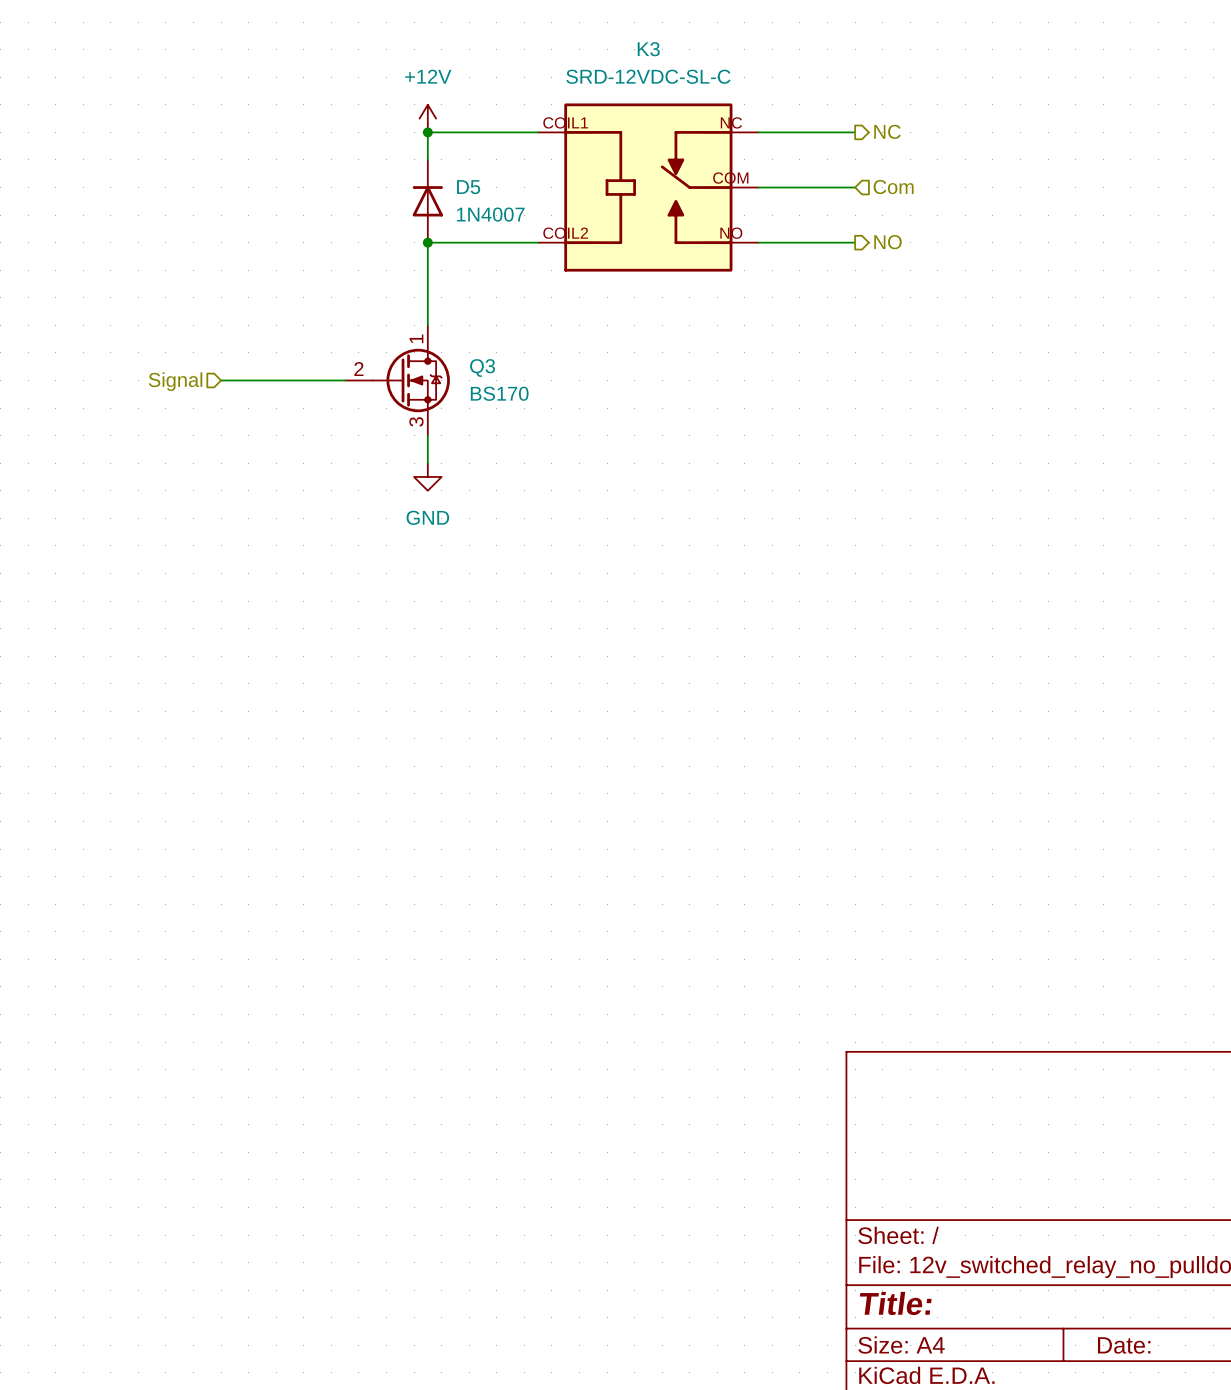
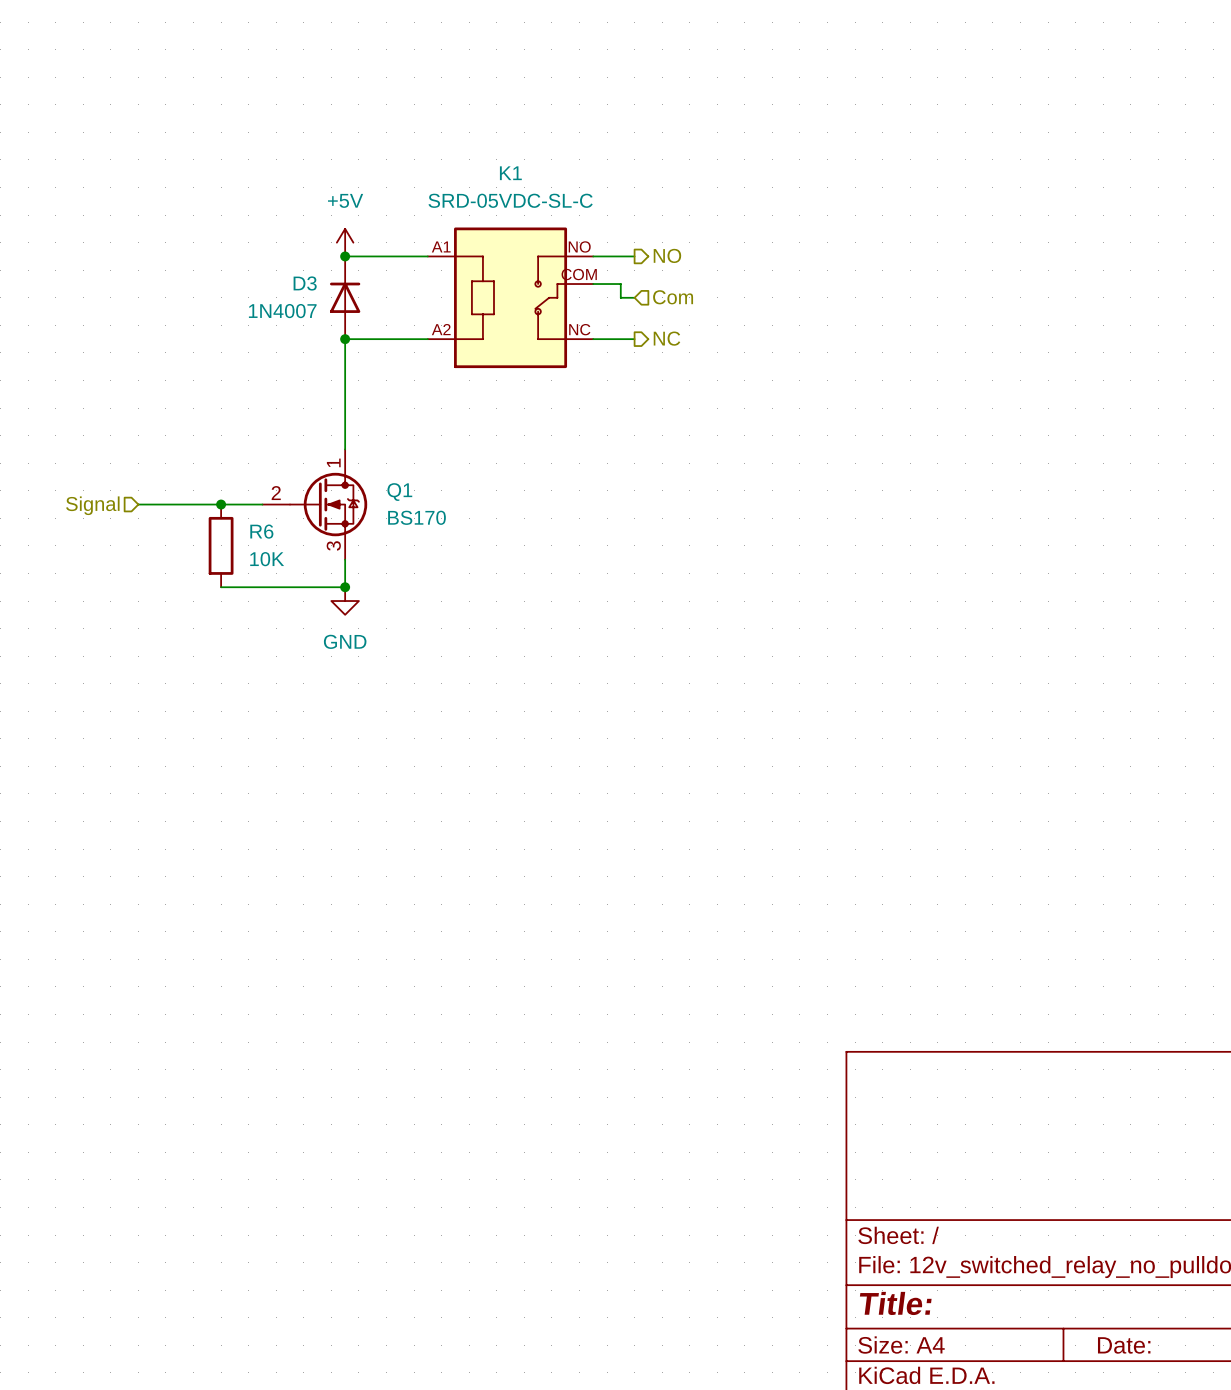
power symbol: +12V (427, 118) -> none
hierarchical label: NC (887, 131) -> none
junction: (427, 132) -> none
wire: (538, 132) (427, 132) (427, 159) -> none
wire: (758, 132) (855, 132) -> none
K3: SRD-12VDC-SL-C (648, 187) -> none
wire: (758, 187) (855, 187) -> none
hierarchical label position: Com (893, 187) -> Com (673, 297)
D5: 1N4007 (427, 201) -> none
power symbol: none -> +5V (345, 242)
junction: (427, 242) -> none
wire: (538, 242) (427, 242) (427, 325) -> none
wire: (758, 242) (855, 242) -> none
hierarchical label position: NO (887, 242) -> NO (667, 255)
wire: none -> (345, 256) (427, 256)
junction: none -> (345, 256)
wire: none -> (593, 284) (620, 284) (620, 297) (634, 297)
D3: none -> 1N4007 (345, 297)
K1: none -> SRD-05VDC-SL-C (510, 297)
hierarchical label: none -> NC (666, 338)
junction: none -> (345, 339)
wire: none -> (427, 339) (345, 339) (345, 449)
wire: none -> (593, 339) (634, 339)
wire: (221, 380) (345, 380) -> (138, 504) (262, 504)
Q3: BS170 (397, 380) -> none
hierarchical label position: Signal (175, 381) -> Signal (92, 505)
wire: (427, 435) (427, 463) -> none
power symbol position: GND (427, 476) -> GND (345, 601)
junction: none -> (221, 504)
Q1: none -> BS170 (314, 504)
R6: none -> 10K (221, 545)
wire: none -> (345, 559) (345, 587) (221, 587)
junction: none -> (345, 587)

